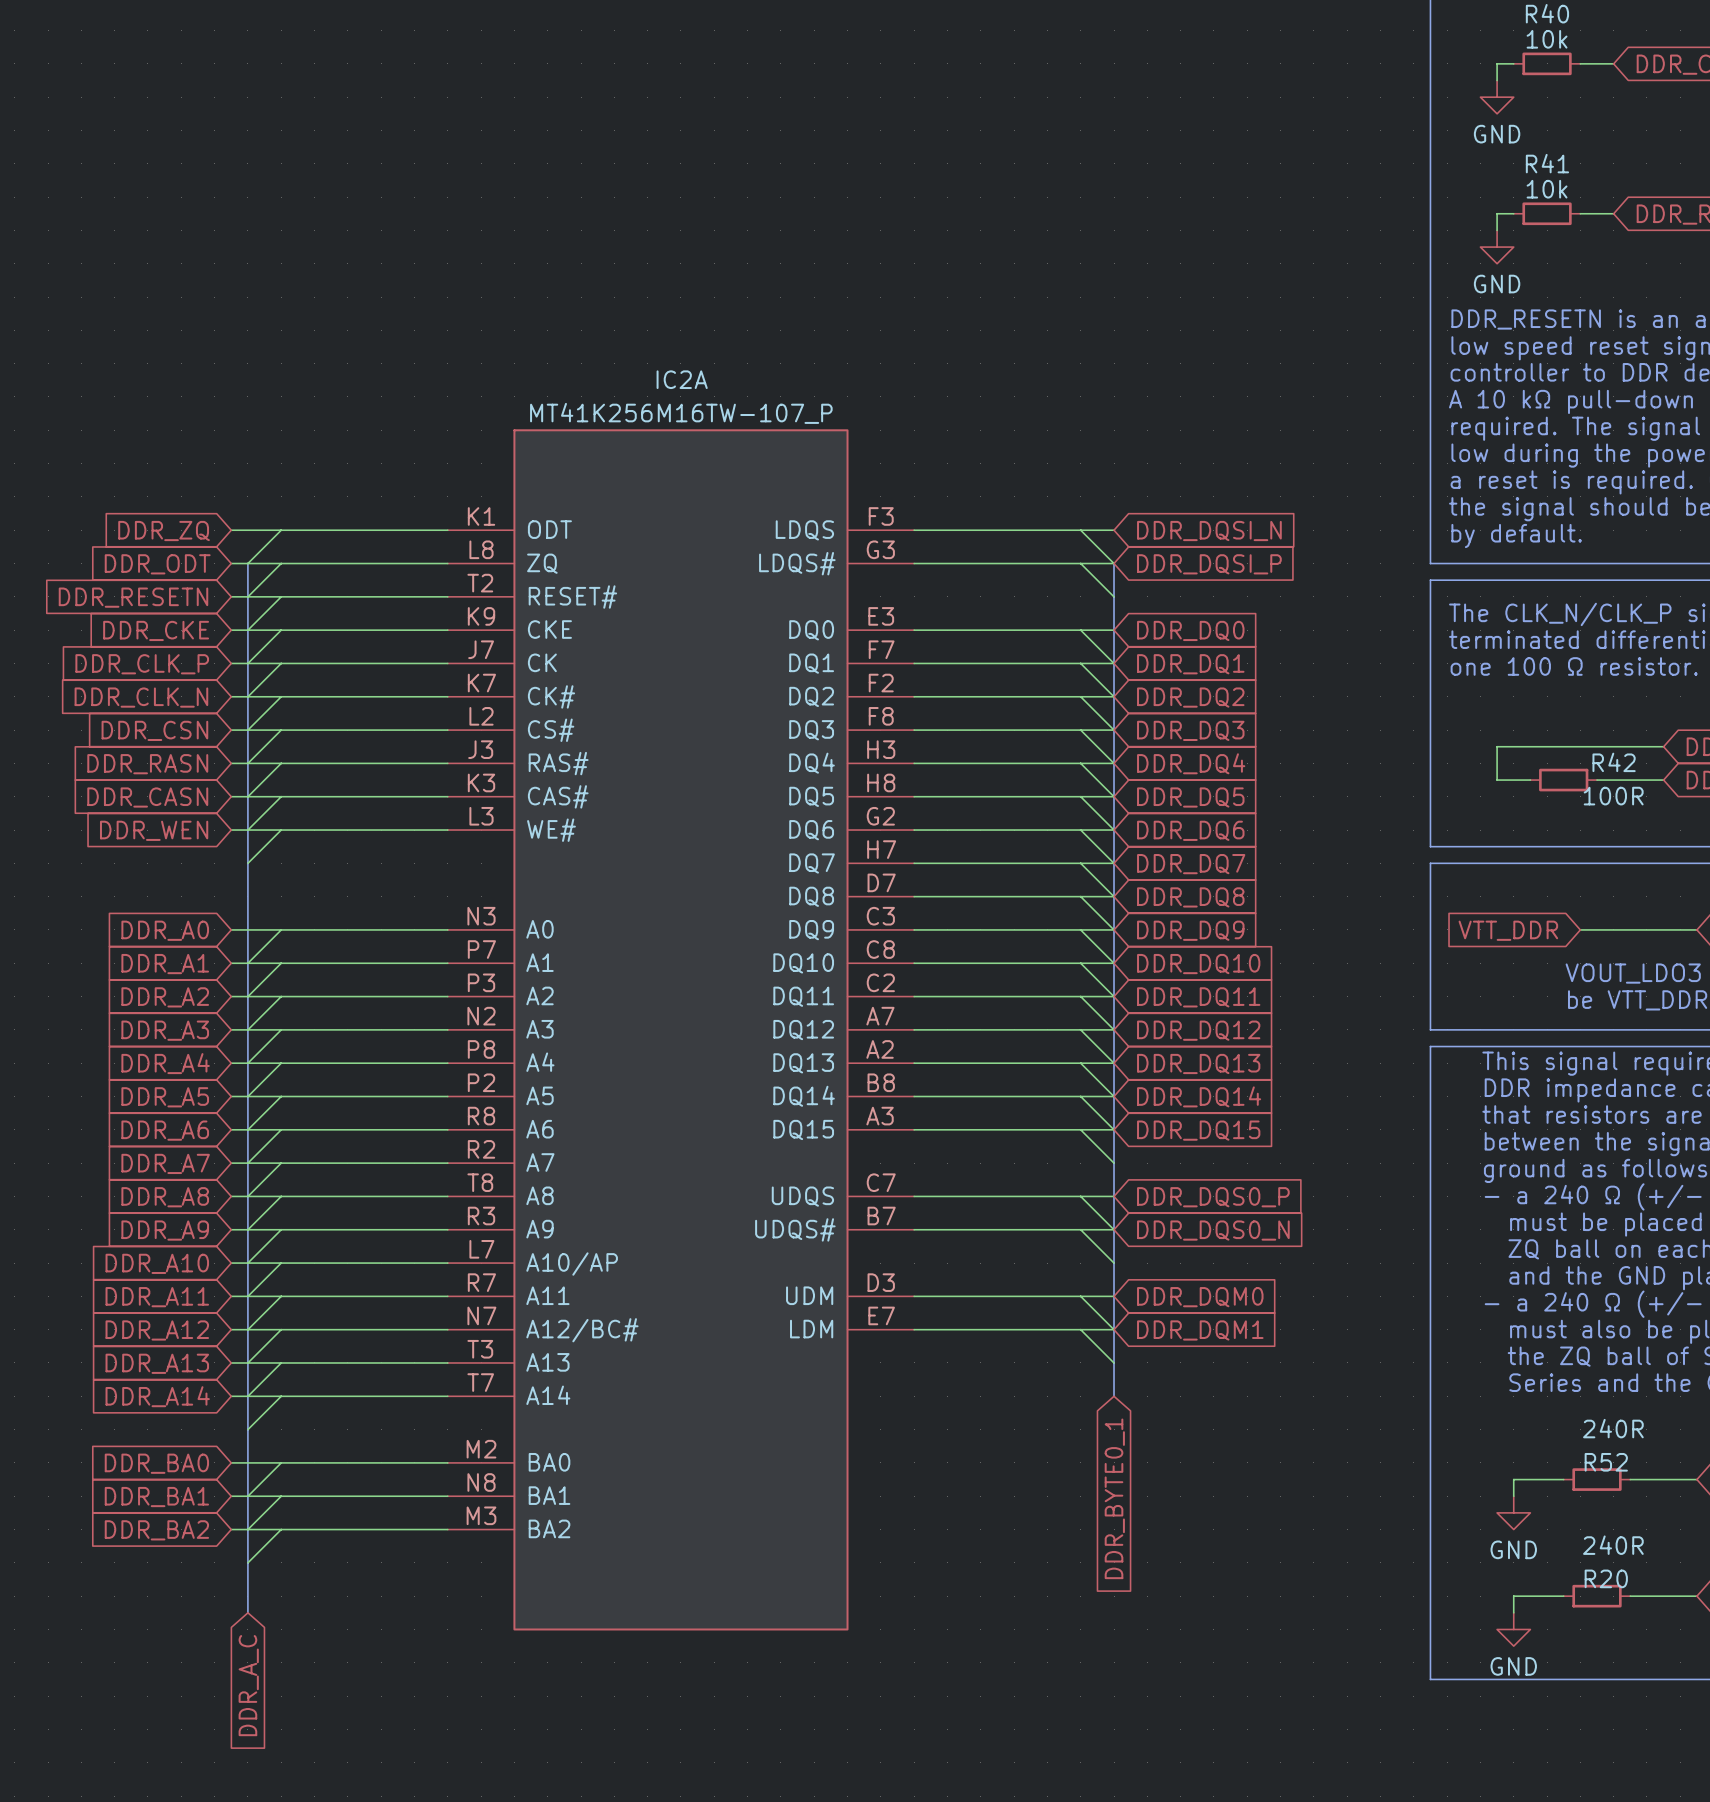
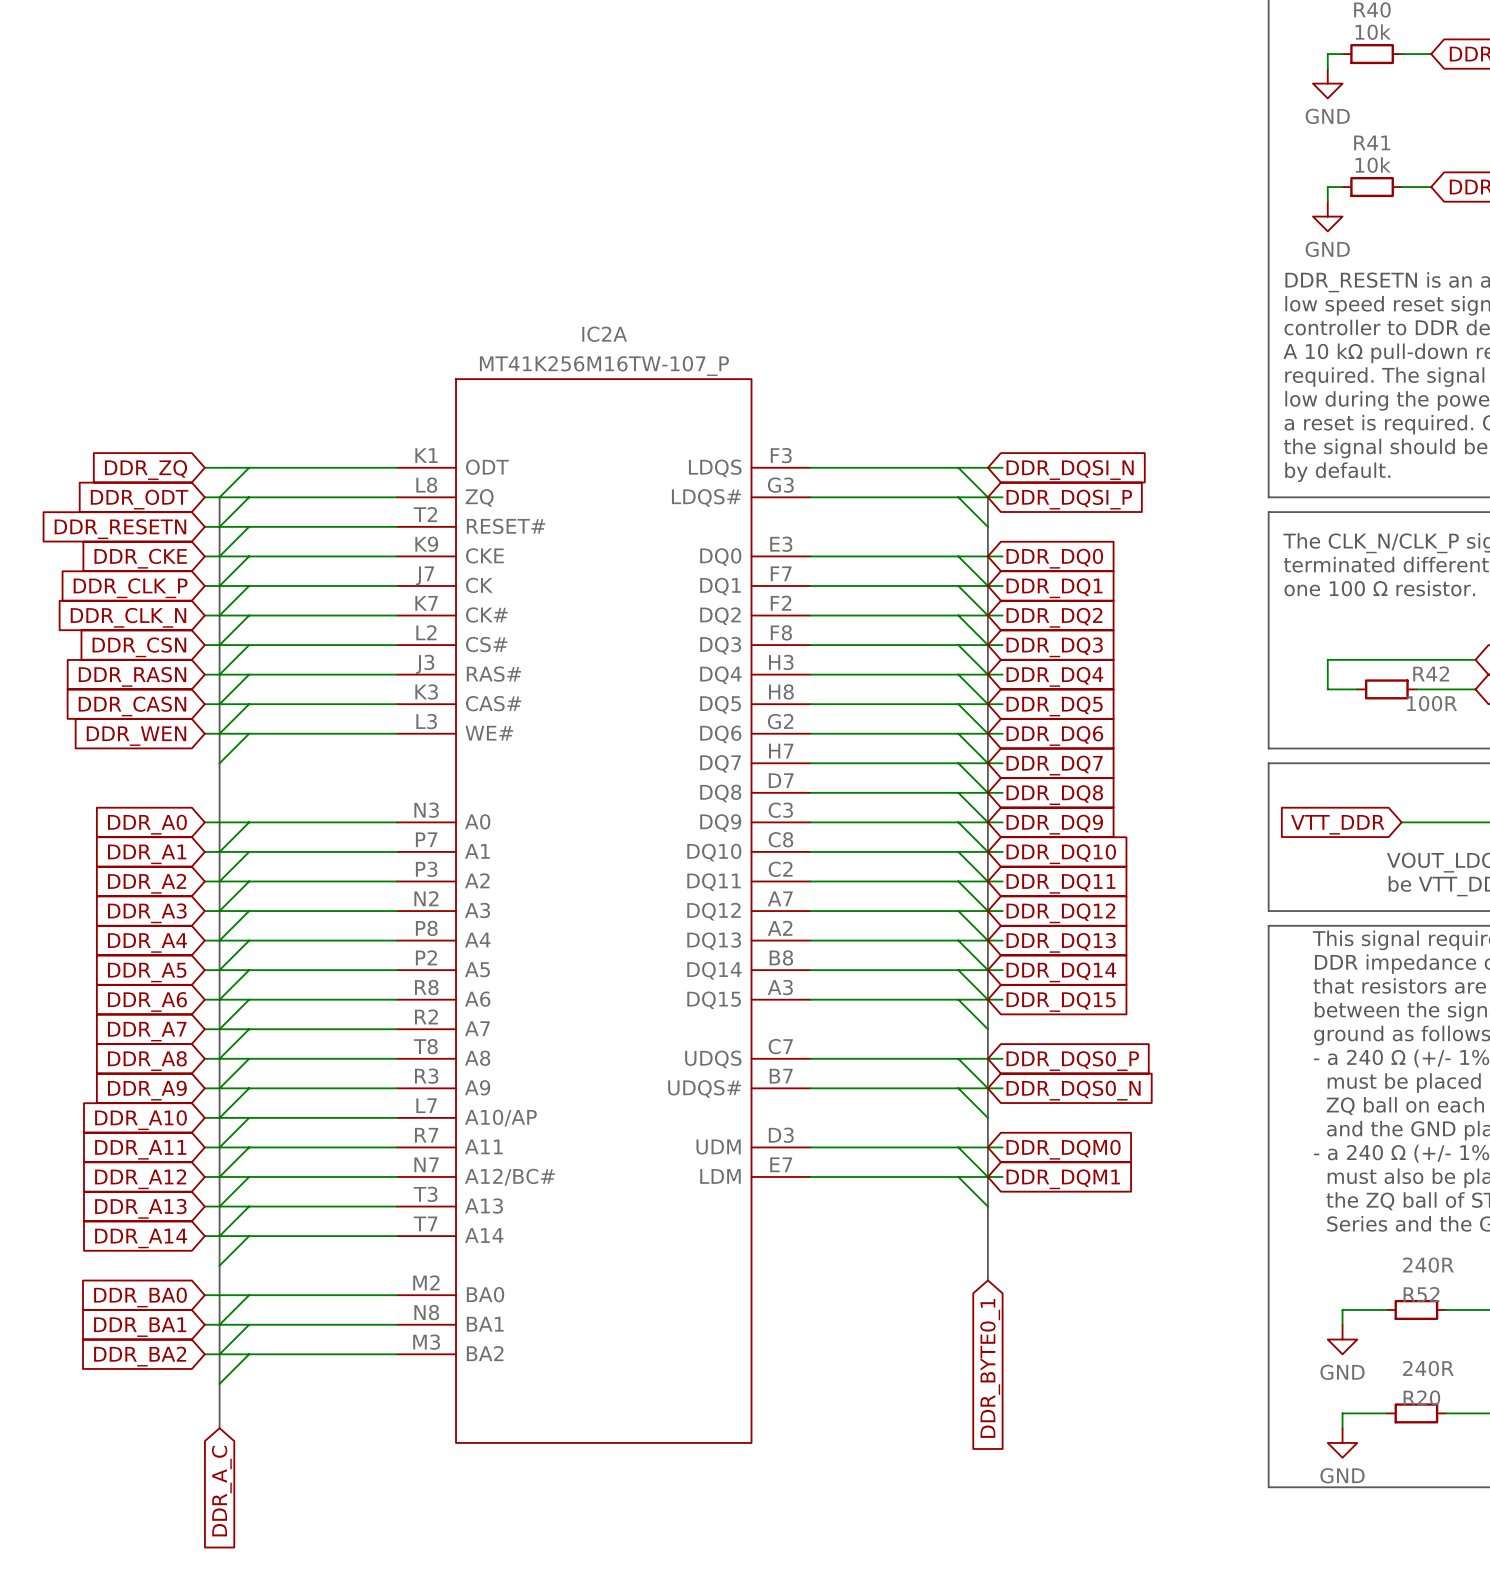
wire: none -> (987, 467) (1002, 467)
wire: none -> (987, 497) (1002, 497)
wire: none -> (987, 556) (1002, 556)
wire: none -> (987, 585) (1002, 585)
wire: none -> (987, 615) (1002, 615)
wire: none -> (987, 645) (1002, 645)
wire: none -> (987, 674) (1002, 674)
wire: none -> (987, 704) (1002, 704)
wire: none -> (987, 733) (1002, 733)
wire: none -> (987, 763) (1002, 763)
wire: none -> (987, 792) (1002, 792)
wire: none -> (987, 822) (1002, 822)
wire: none -> (987, 851) (1002, 851)
wire: none -> (987, 881) (1002, 881)
wire: none -> (987, 911) (1002, 911)
wire: none -> (987, 940) (1002, 940)
wire: none -> (987, 970) (1002, 970)
wire: none -> (987, 999) (1002, 999)
wire: none -> (987, 1058) (1002, 1058)
wire: none -> (987, 1088) (1002, 1088)
wire: none -> (987, 1147) (1002, 1147)
wire: none -> (987, 1177) (1002, 1177)
bus: none -> (987, 1236) (987, 1280)
global label position: DDR_BYTE0_1 (1114, 1498) -> DDR_BYTE0_1 (990, 1368)

